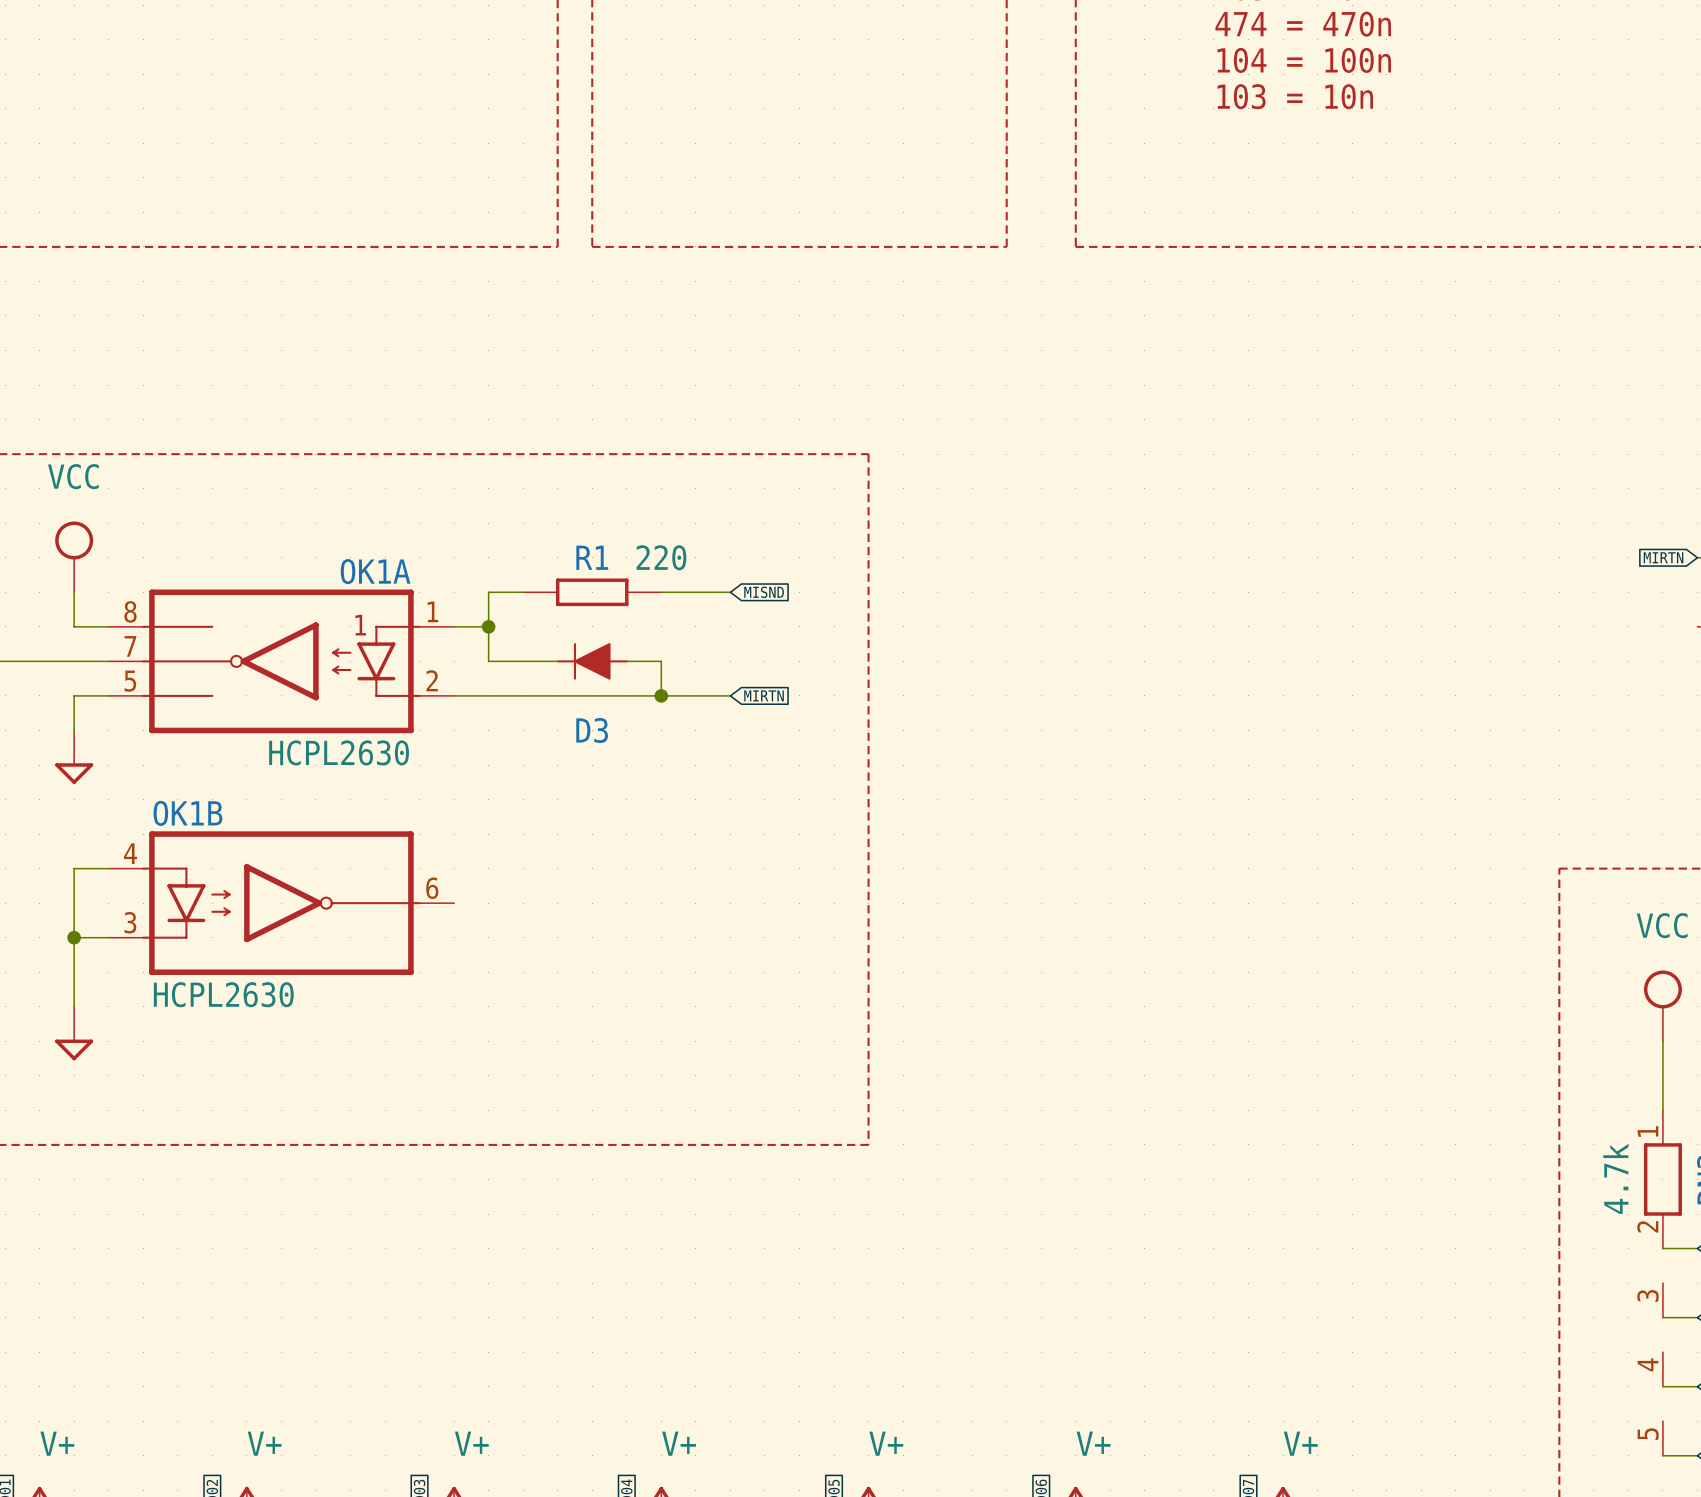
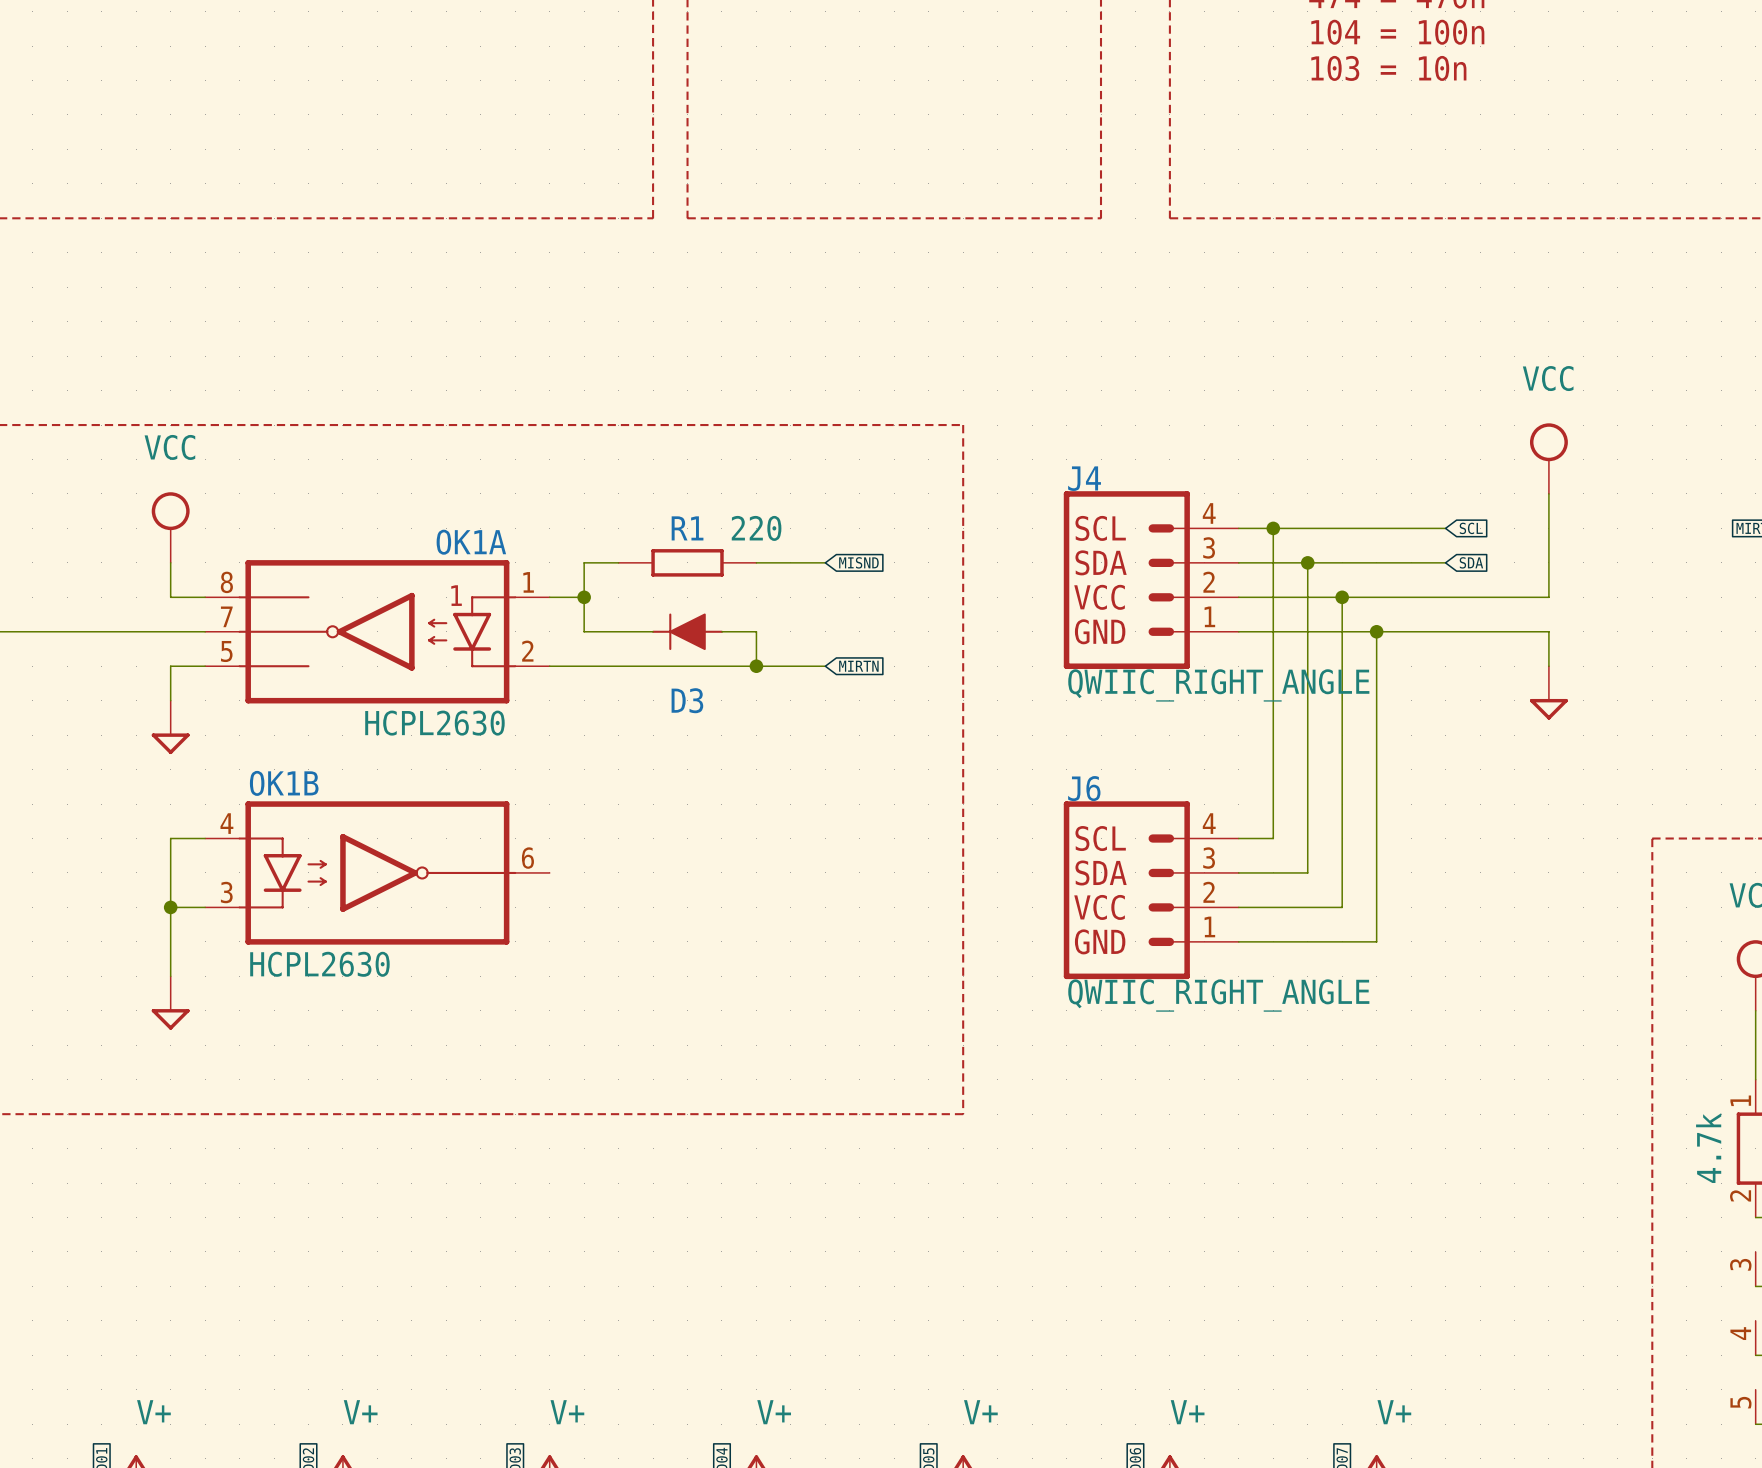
power symbol: none -> VCC (1548, 458)
wire: none -> (1548, 493) (1548, 597) (1238, 597)
wire: none -> (1238, 528) (1445, 528)
wire: none -> (1273, 528) (1273, 838) (1238, 838)
junction: none -> (1273, 528)
global label: none -> SCL (1471, 528)
wire: none -> (1238, 562) (1445, 562)
wire: none -> (1307, 562) (1307, 872) (1238, 872)
junction: none -> (1307, 562)
global label: none -> SDA (1471, 562)
J4: none -> QWIIC_RIGHT_ANGLE (1151, 580)
wire: none -> (1342, 597) (1342, 907) (1238, 907)
junction: none -> (1342, 597)
wire: none -> (1238, 631) (1548, 631) (1548, 666)
wire: none -> (1376, 631) (1376, 941) (1238, 941)
junction: none -> (1376, 631)
power symbol: none -> (1548, 692)
J6: none -> QWIIC_RIGHT_ANGLE (1151, 890)

